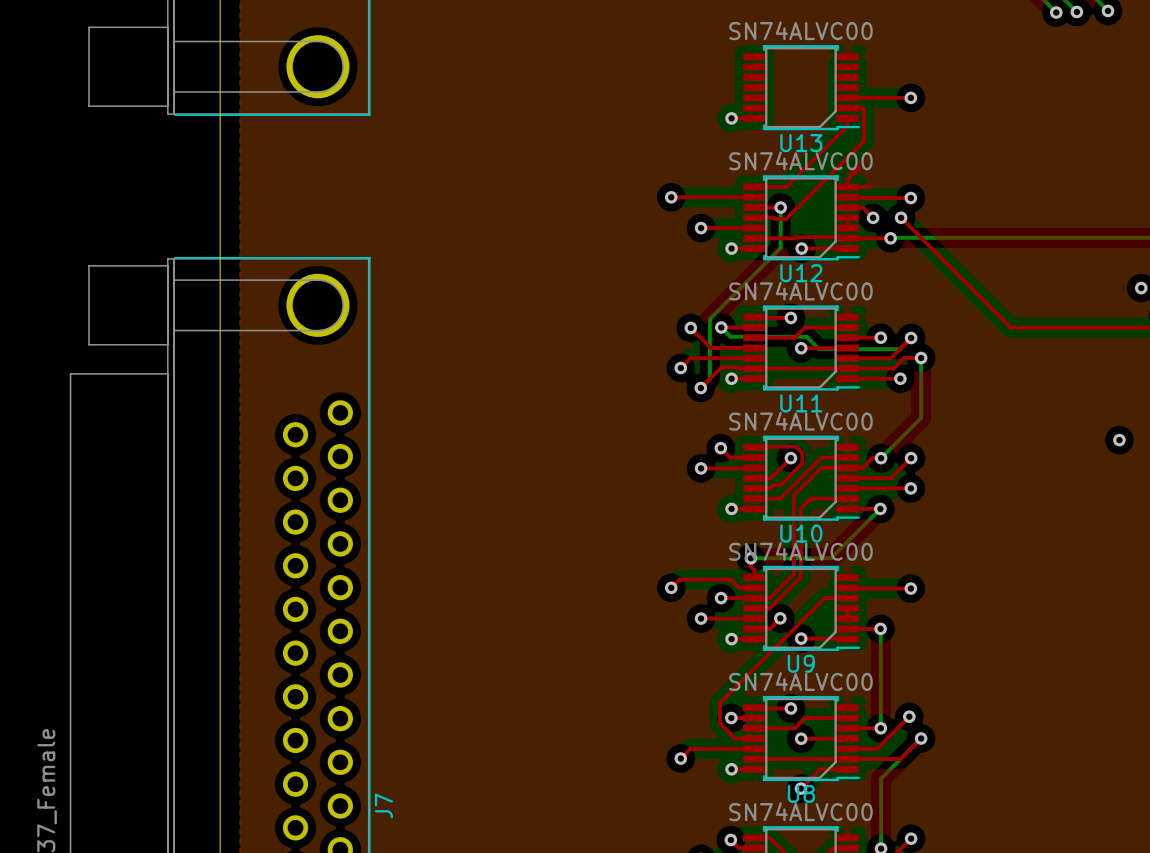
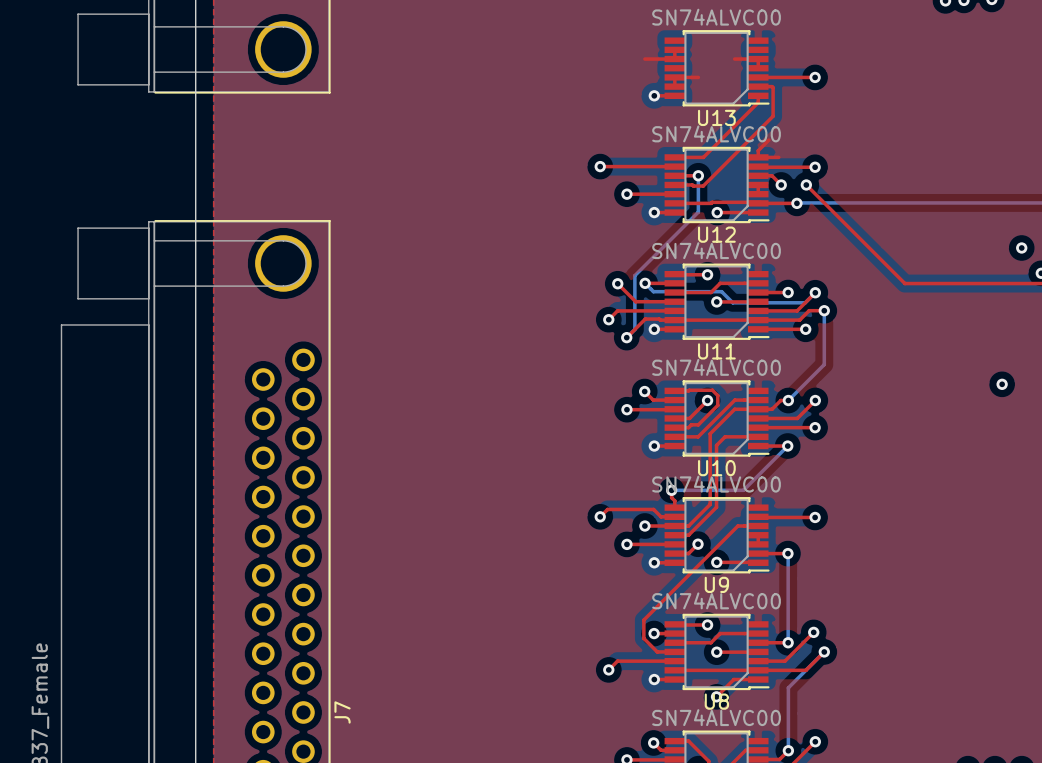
top track: none -> (674, 49) (674, 59) (644, 59)
top track: none -> (734, 59) (758, 59) (758, 68)
top track: none -> (698, 77) (674, 77) (674, 86)

